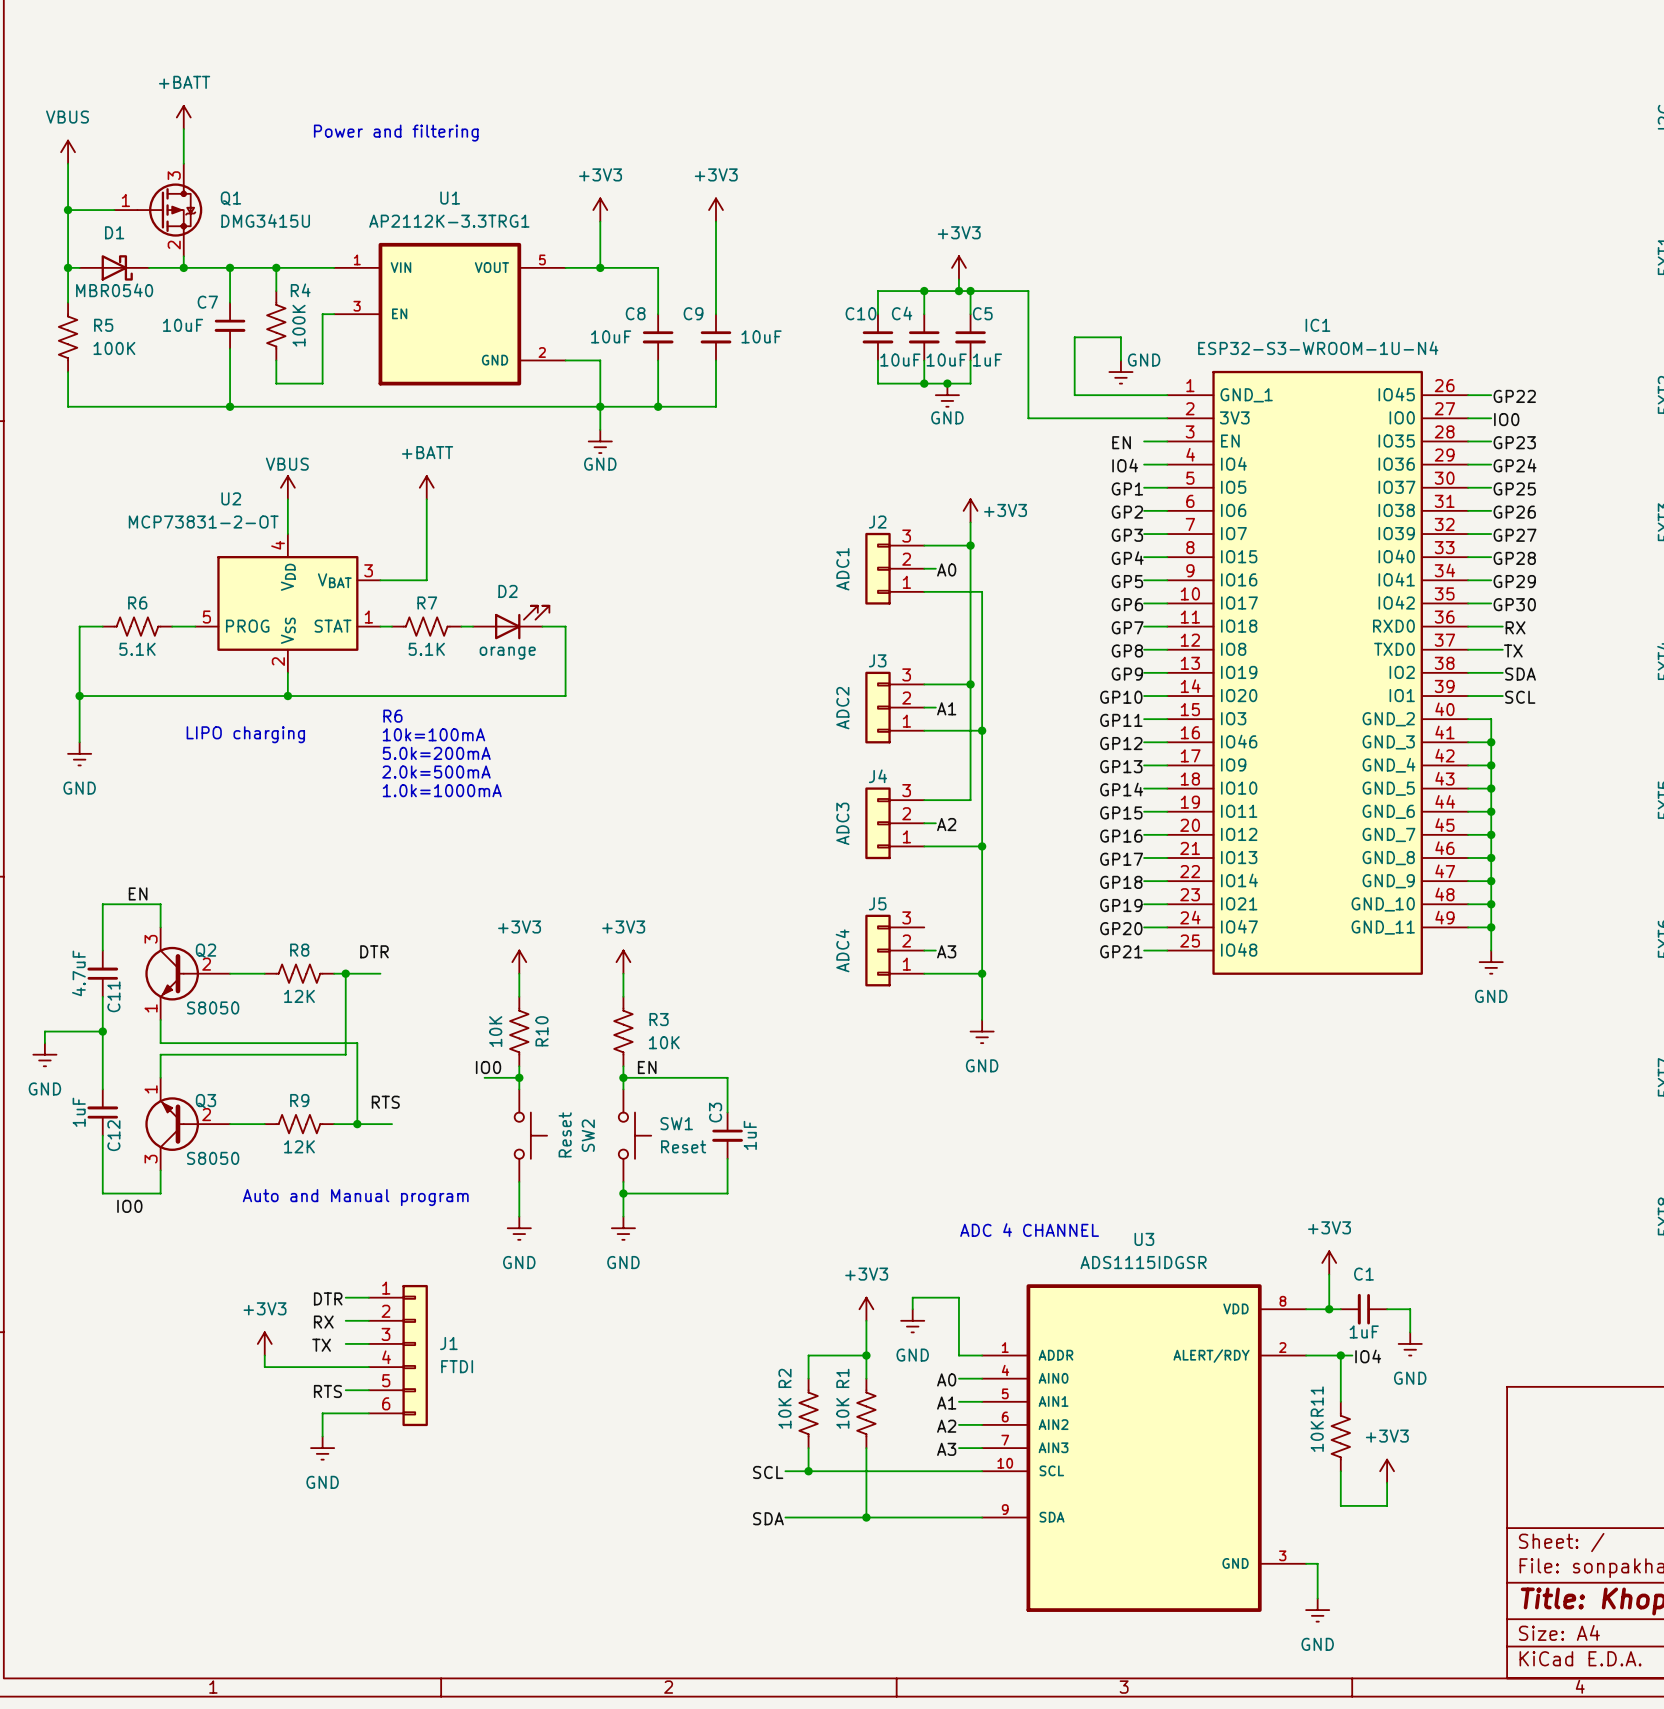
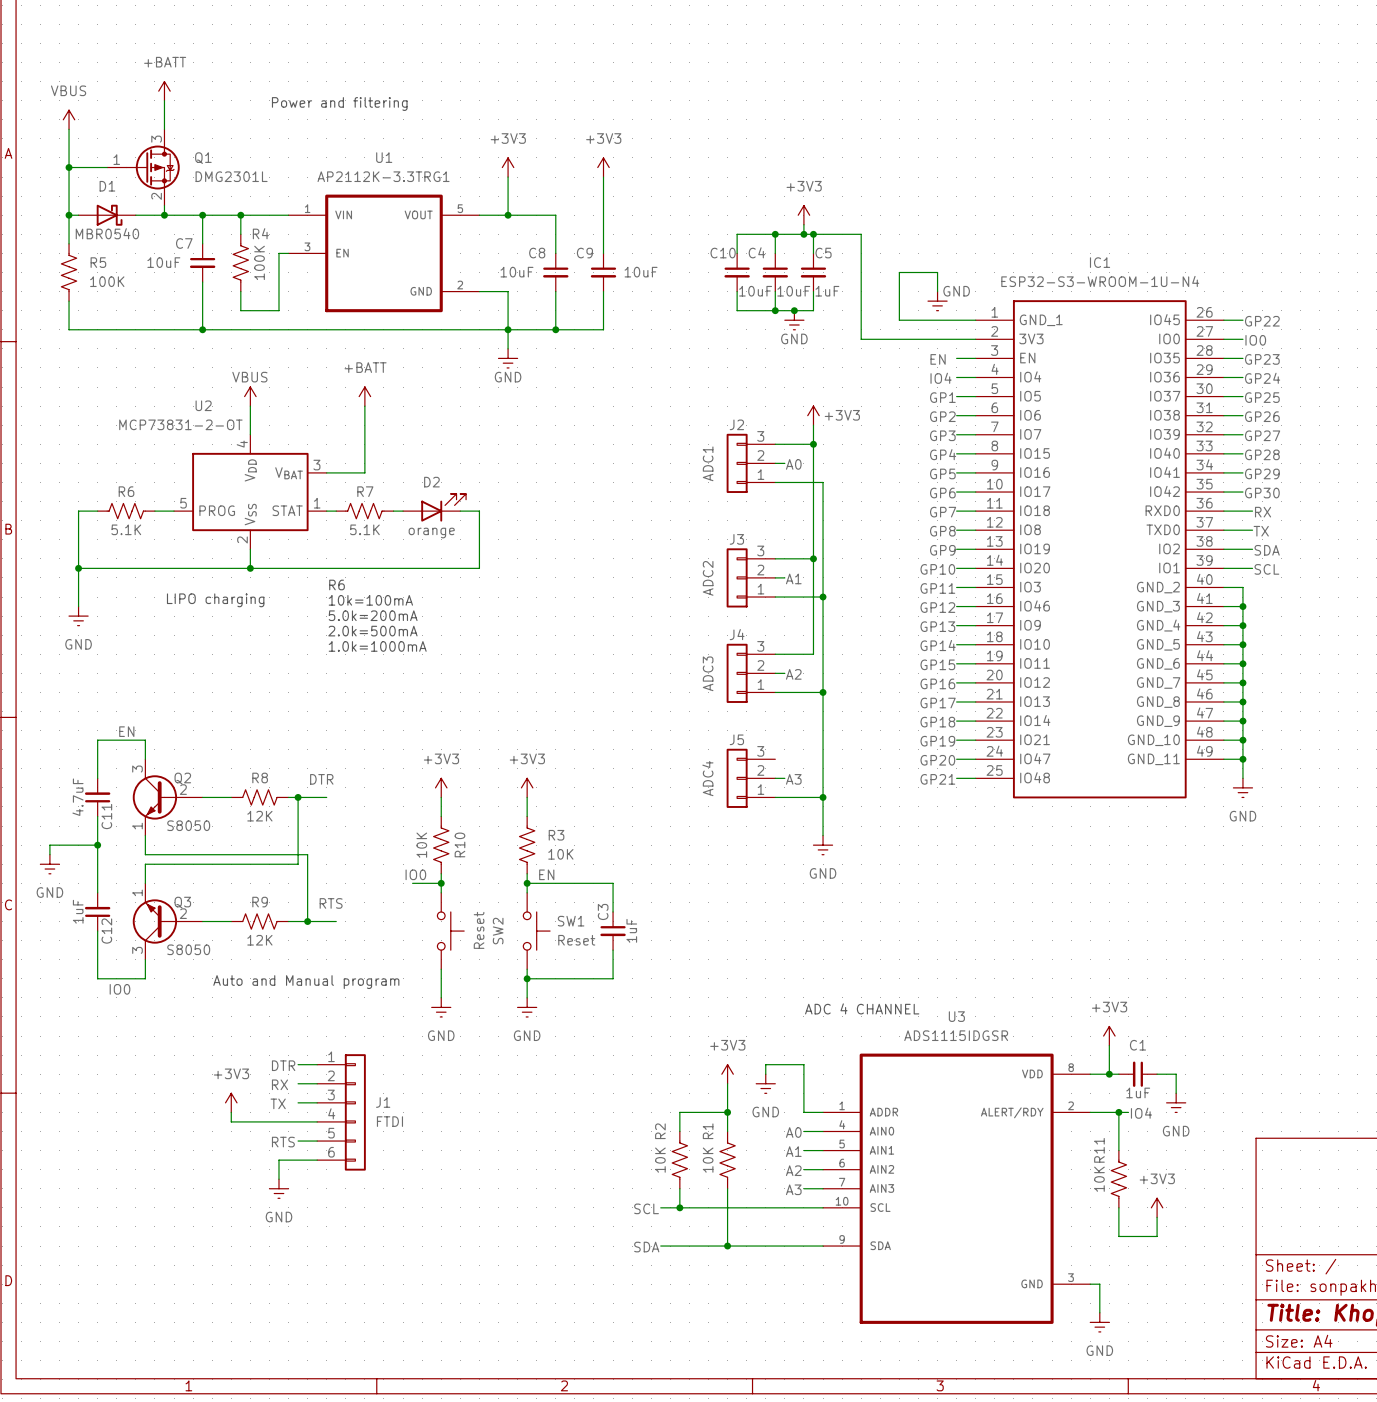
Q1 value: DMG3415U (265, 220) -> DMG2301L (231, 176)

